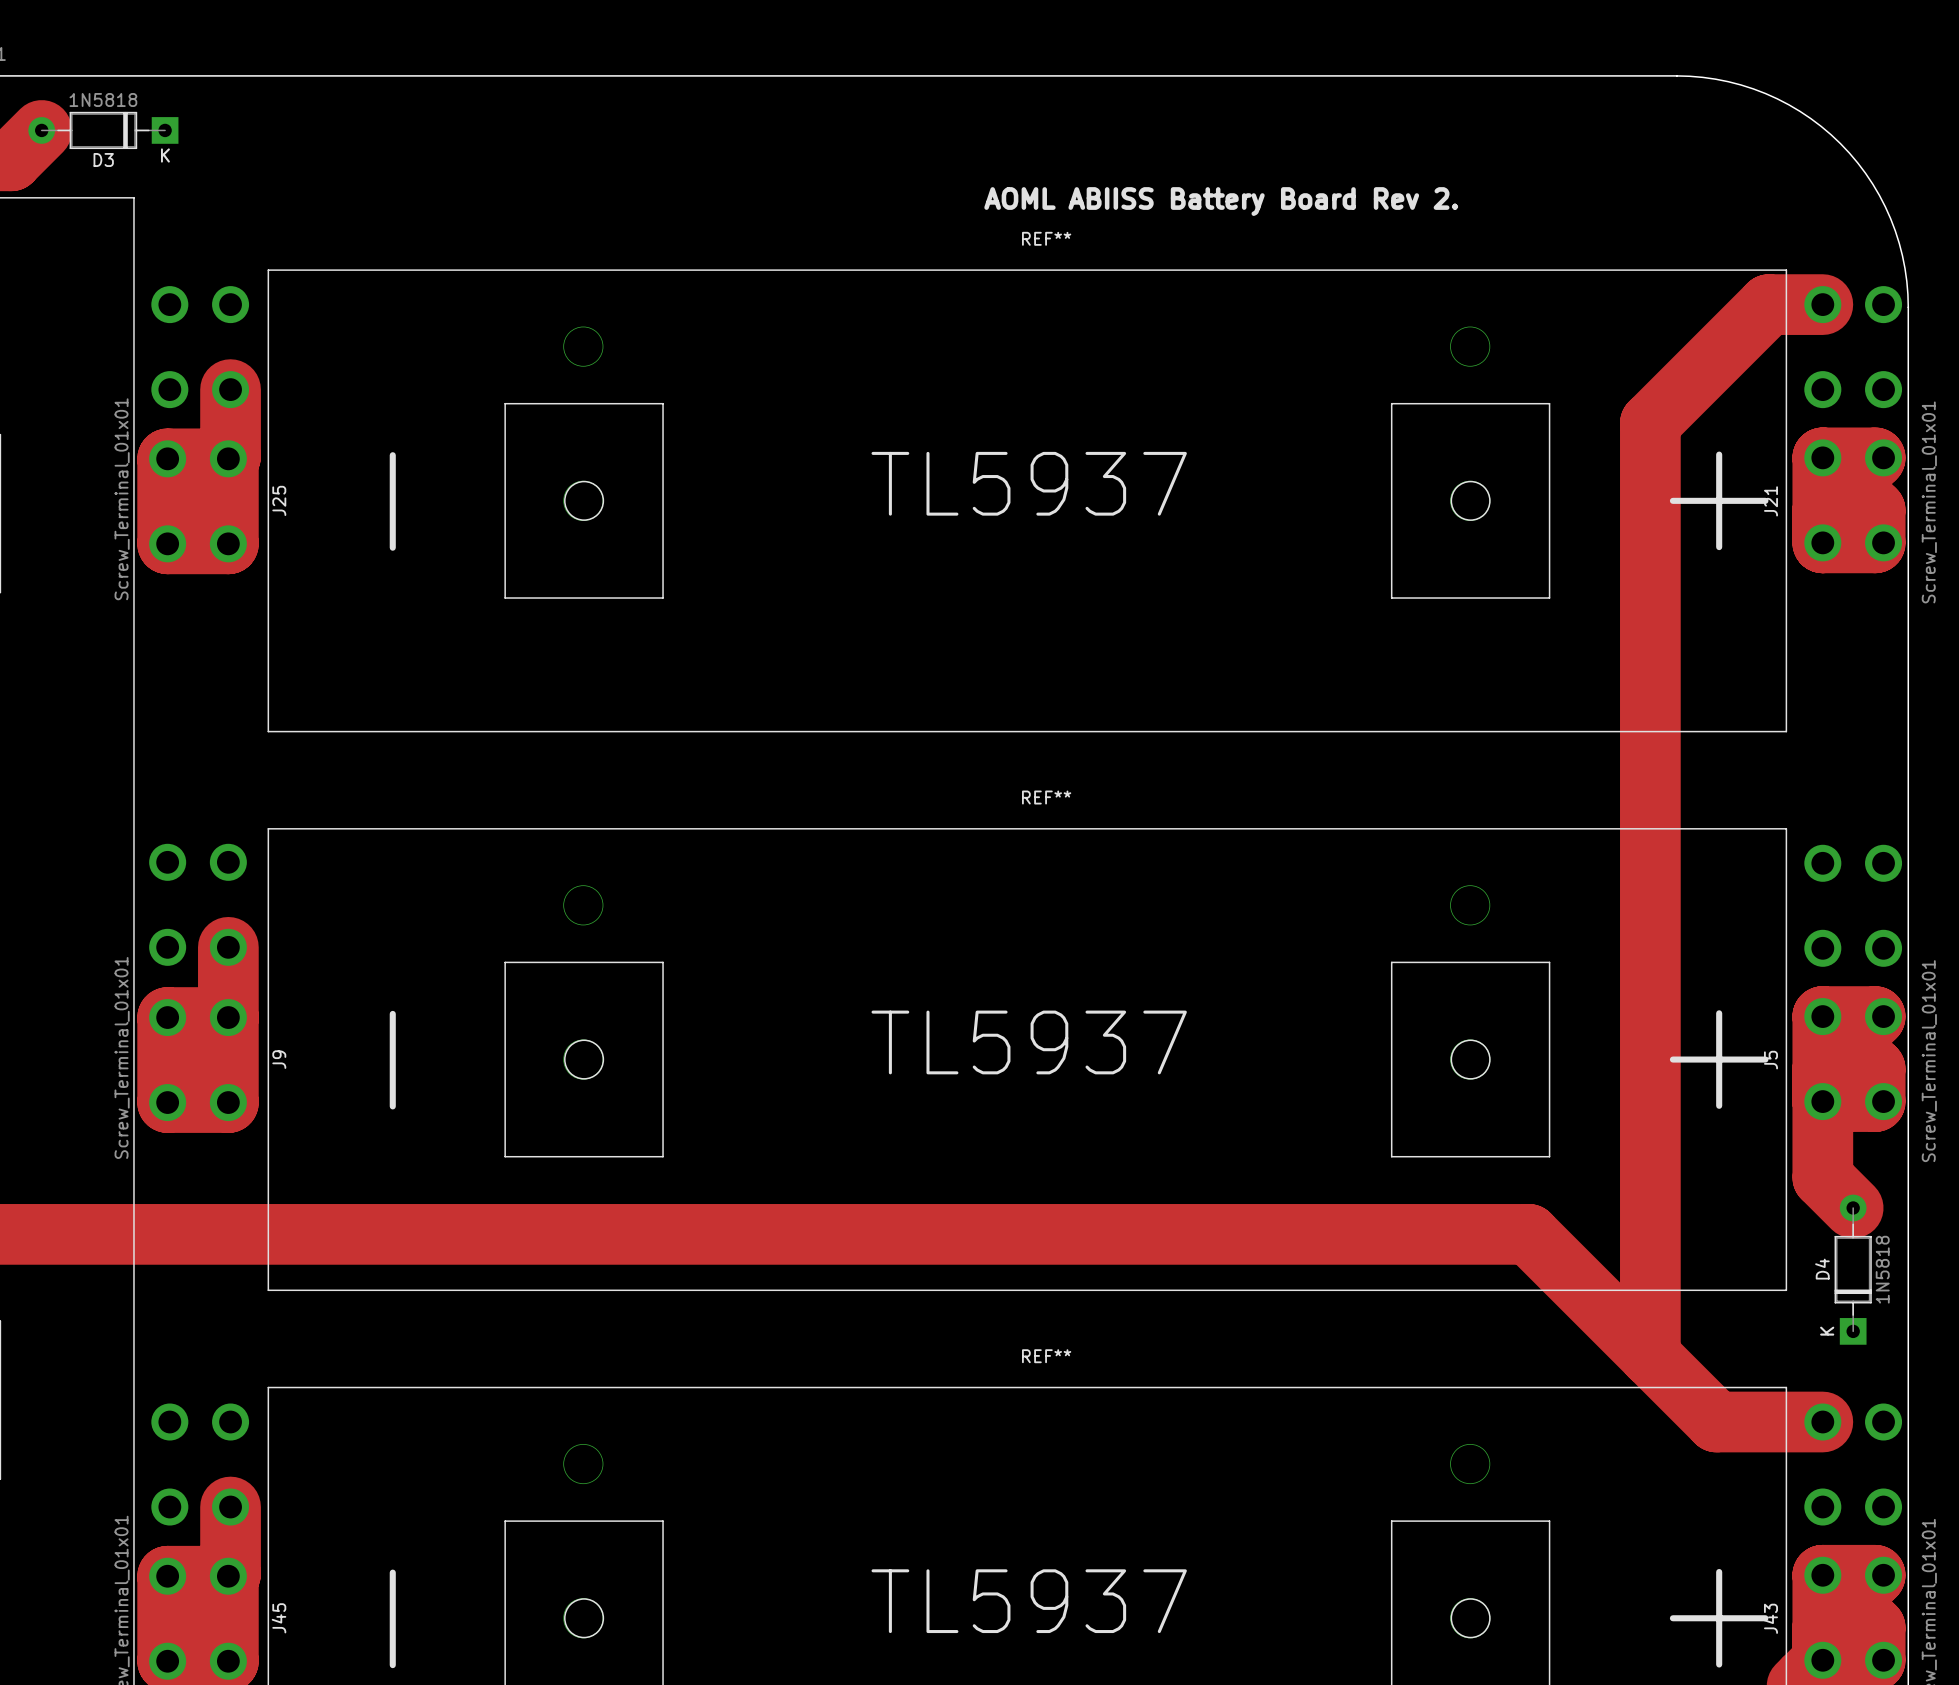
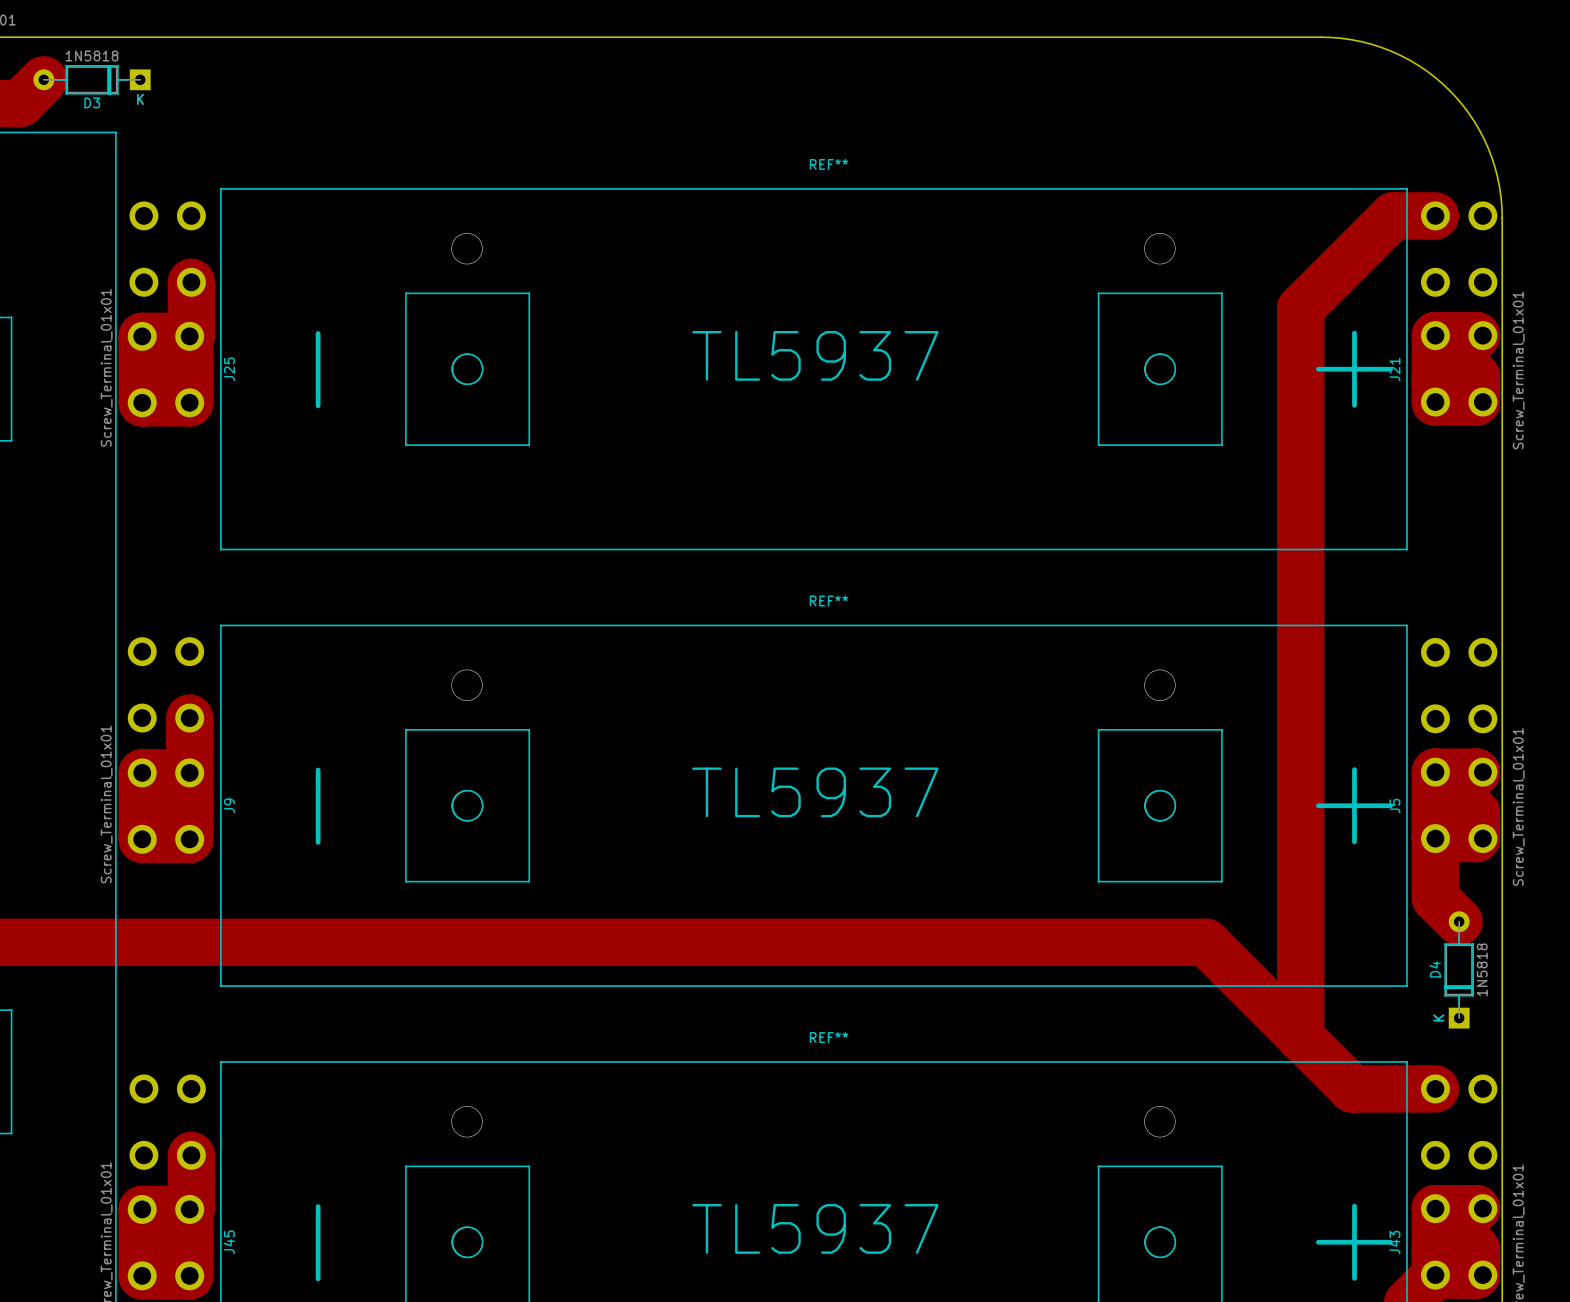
text: AOML ABIISS Battery Board Rev 2. (1221, 201) -> none

